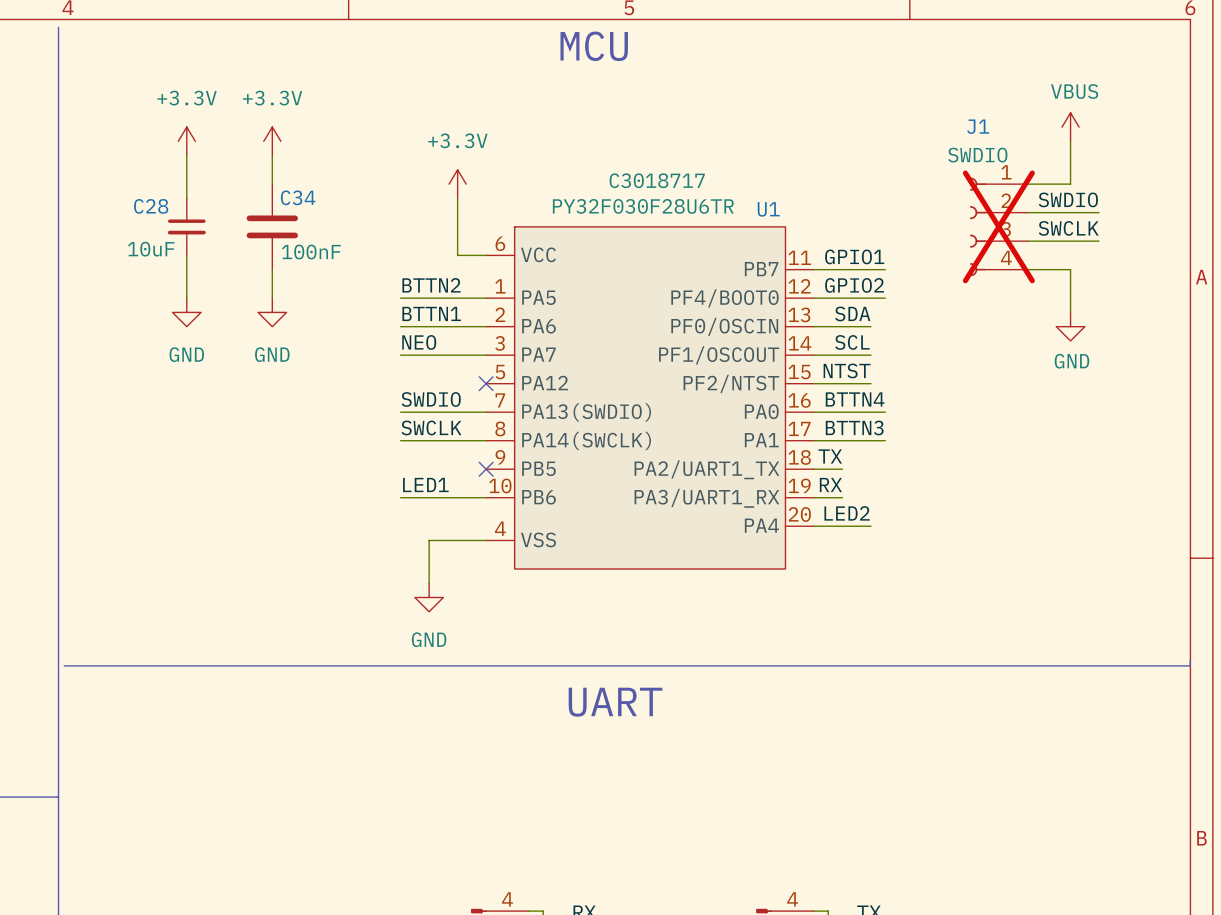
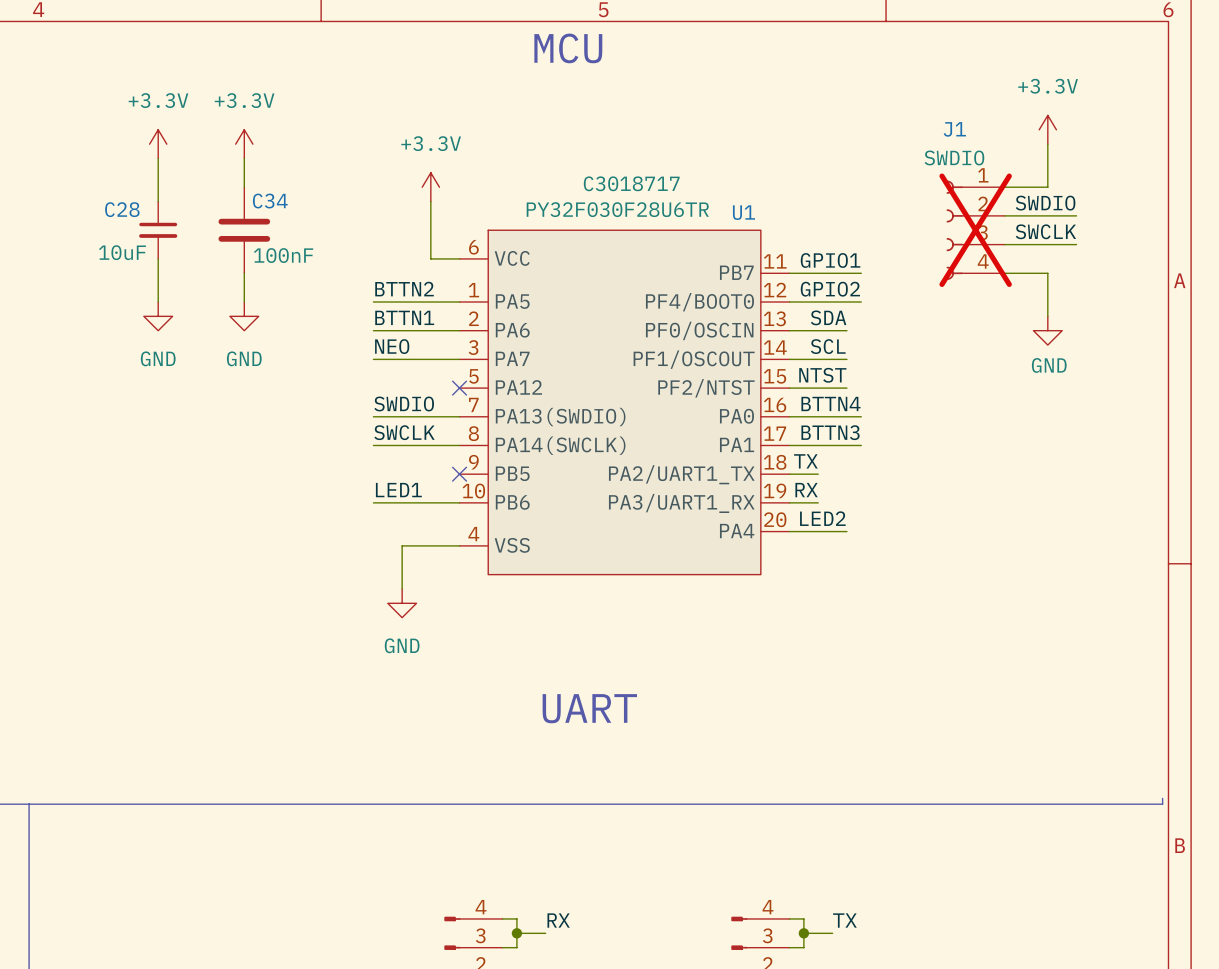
line: (58, 27) (58, 797) -> (1162, 798) (1162, 804) (29, 804)
power symbol: VBUS (1070, 127) -> +3.3V (1047, 129)
line: (1190, 660) (1190, 665) (64, 665) -> none

